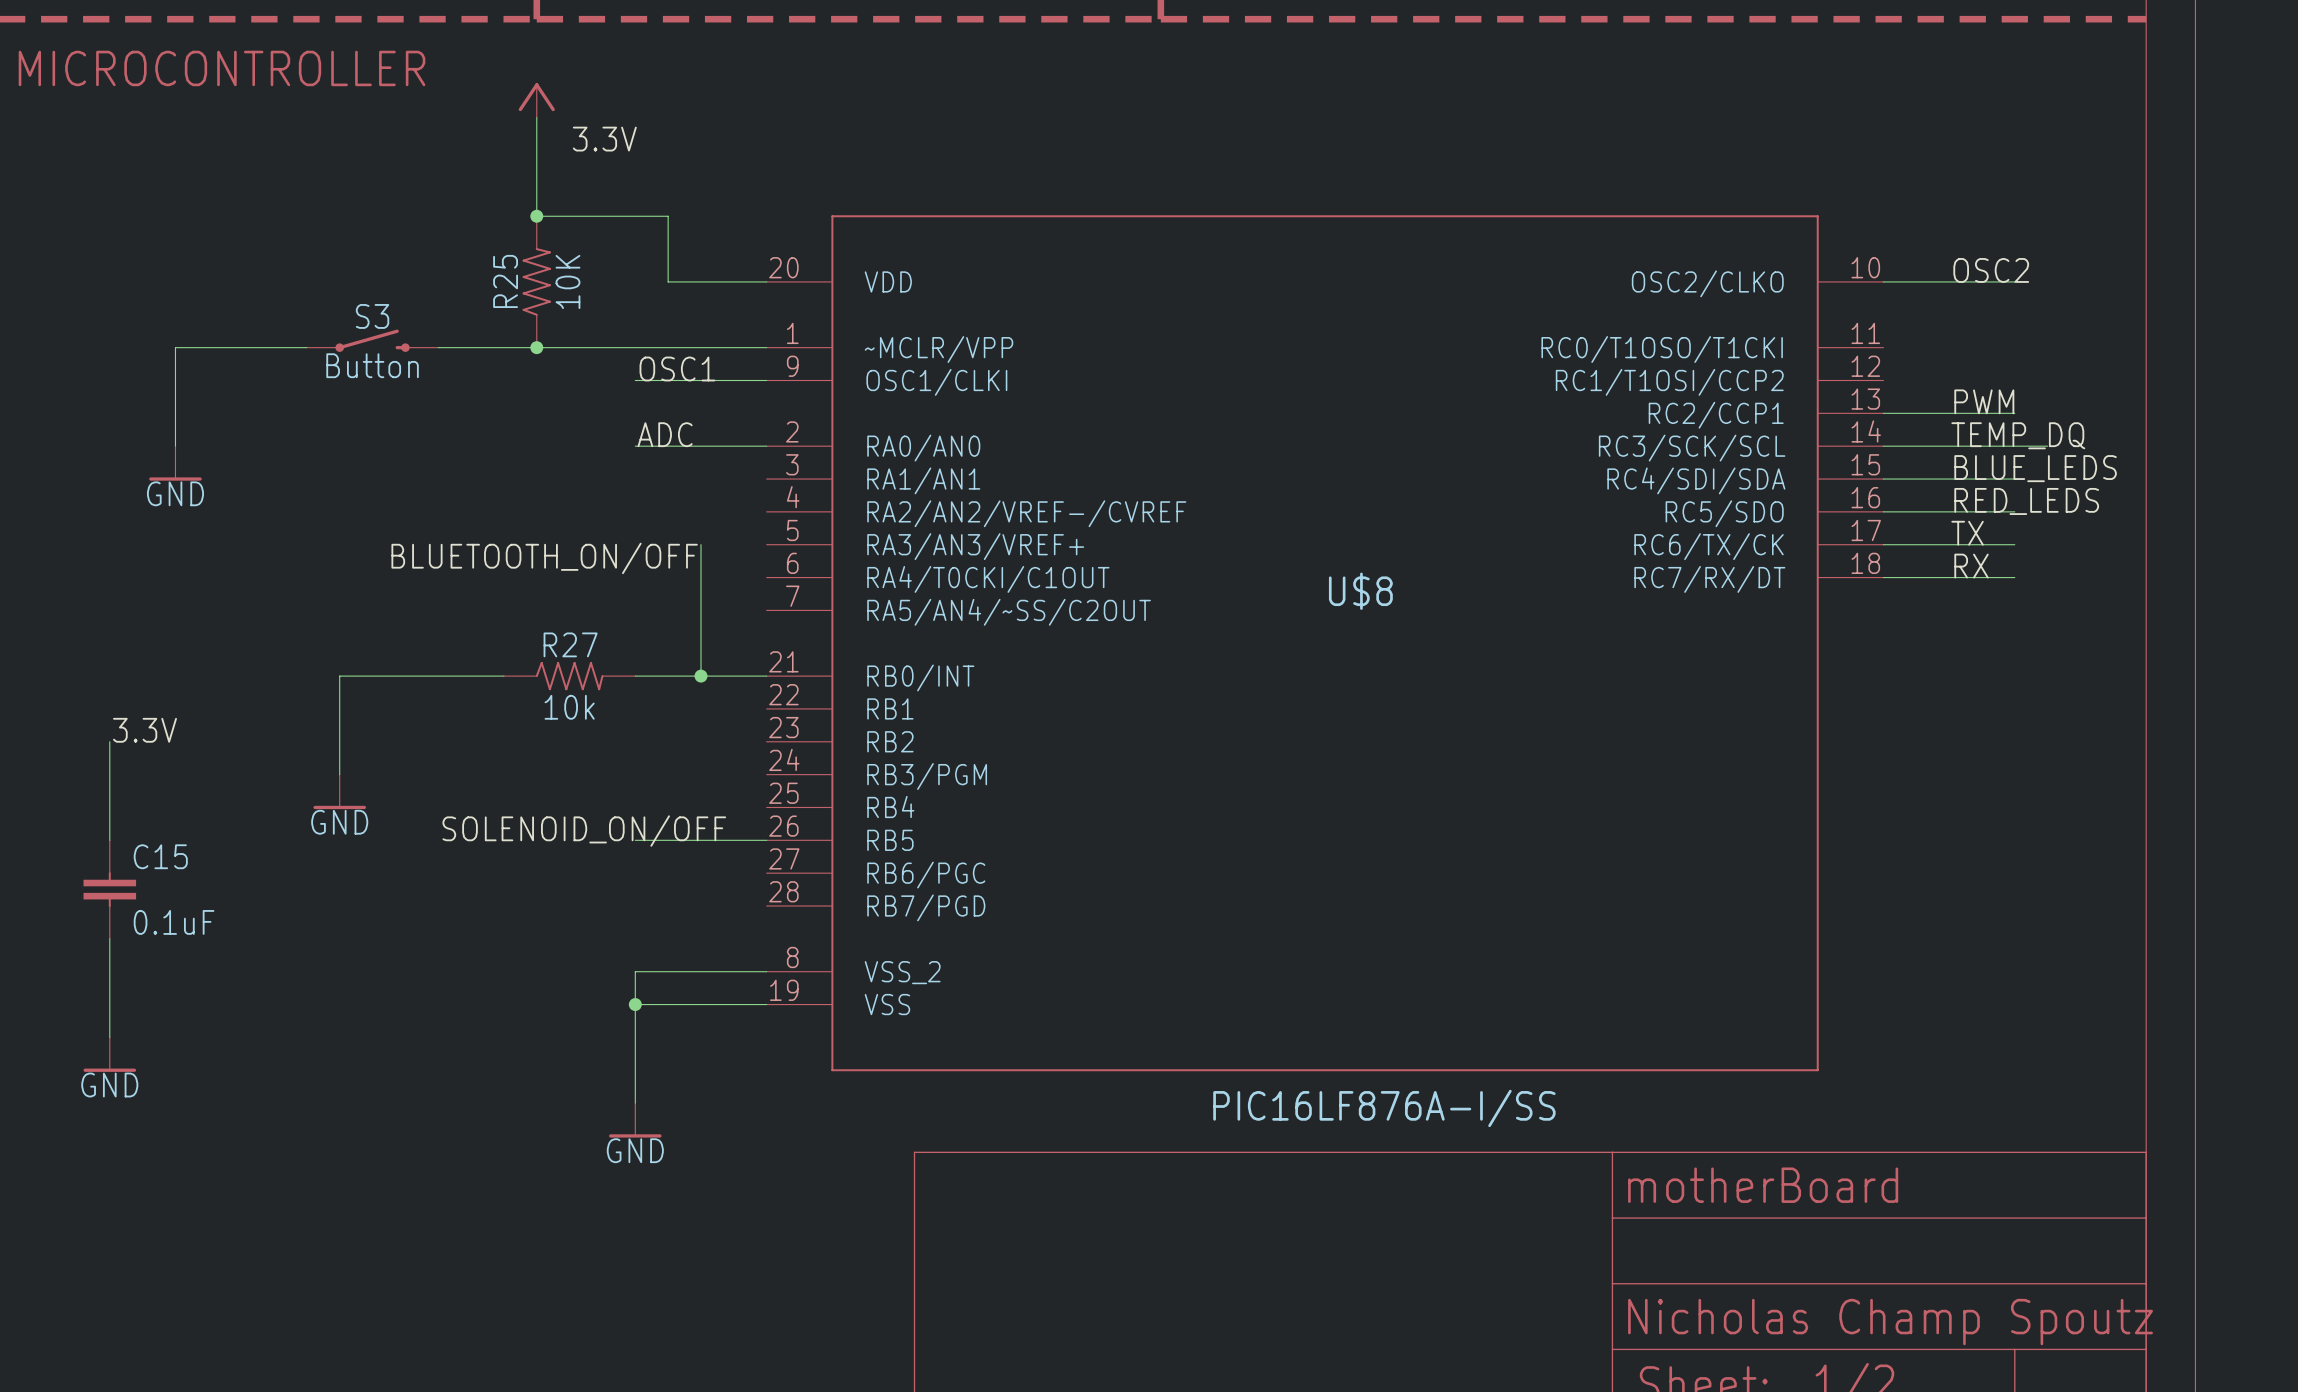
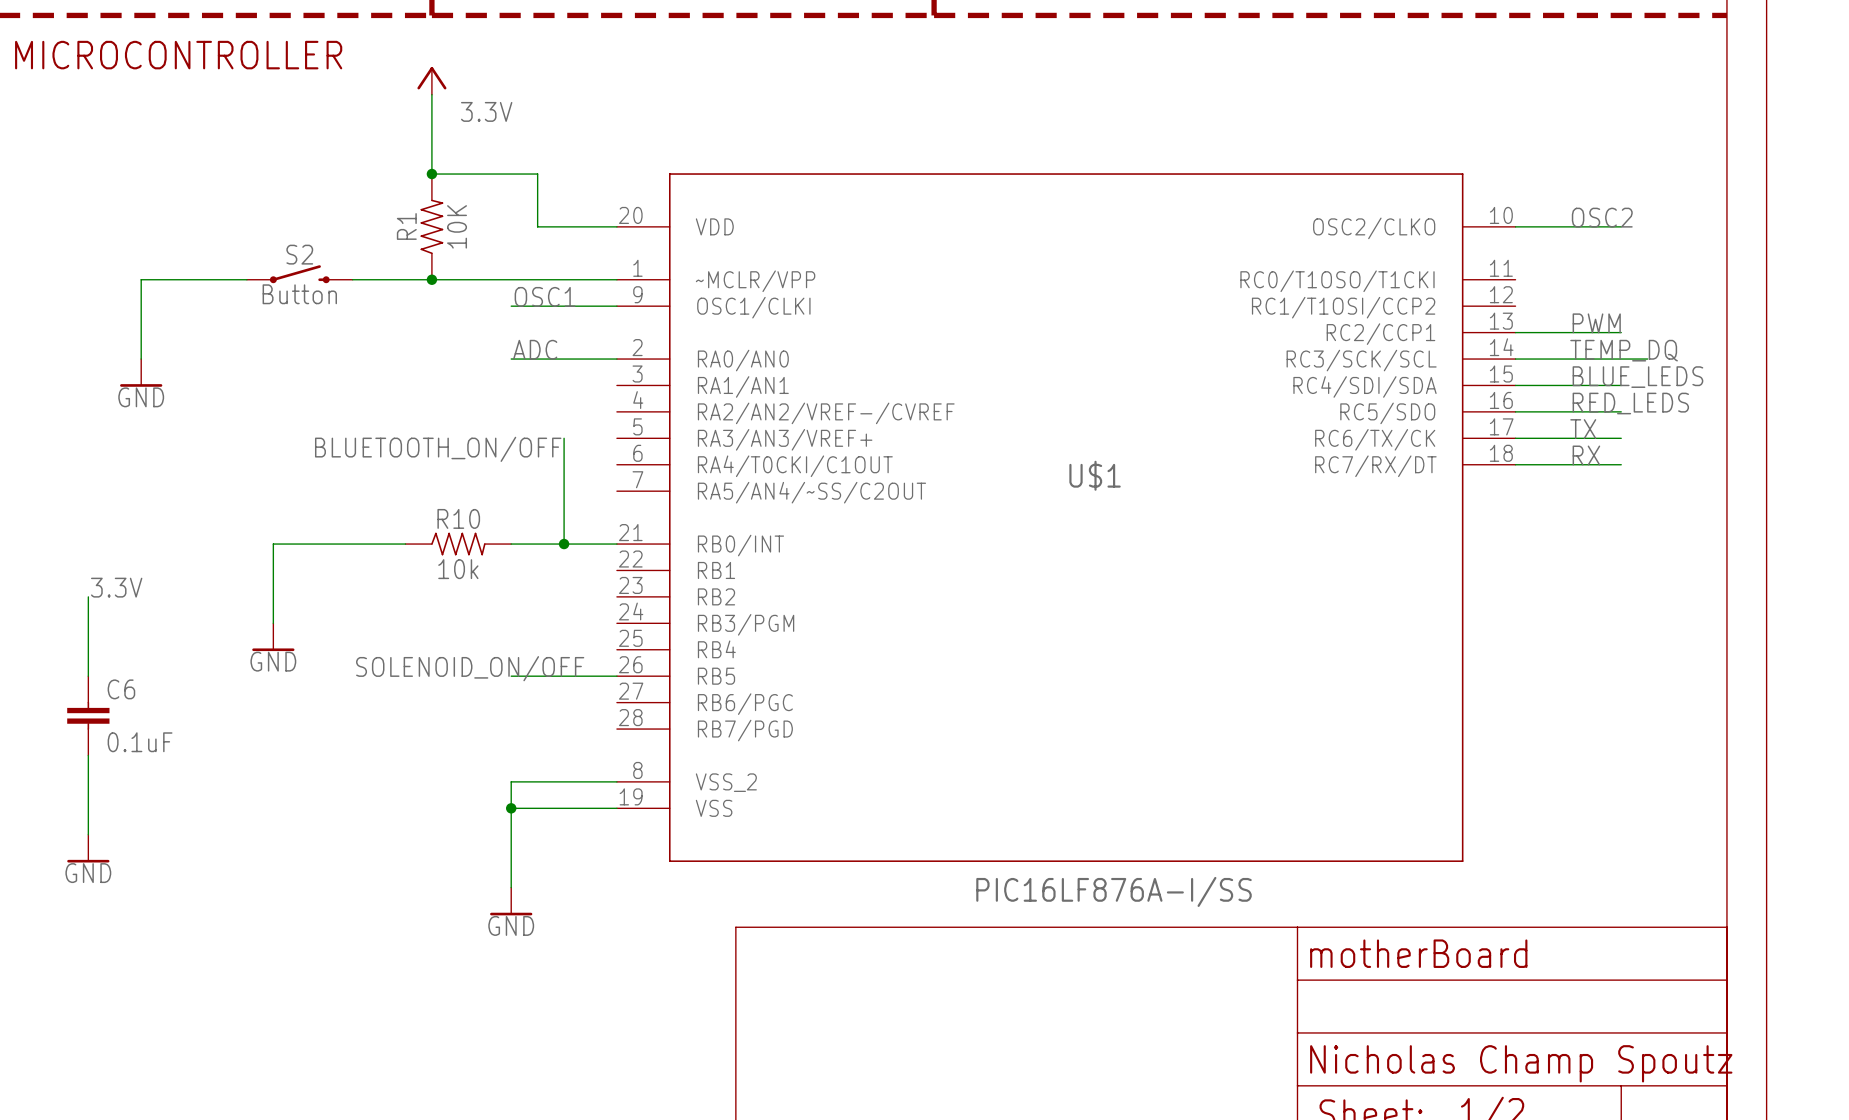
R25 name: R25 (505, 281) -> R1 (406, 226)
S3 name: S3 (372, 316) -> S2 (299, 254)
U$8 name: U$8 (1360, 591) -> U$1 (1095, 475)
R27 name: R27 (570, 644) -> R10 (458, 518)
C15 name: C15 (160, 856) -> C6 (121, 689)

